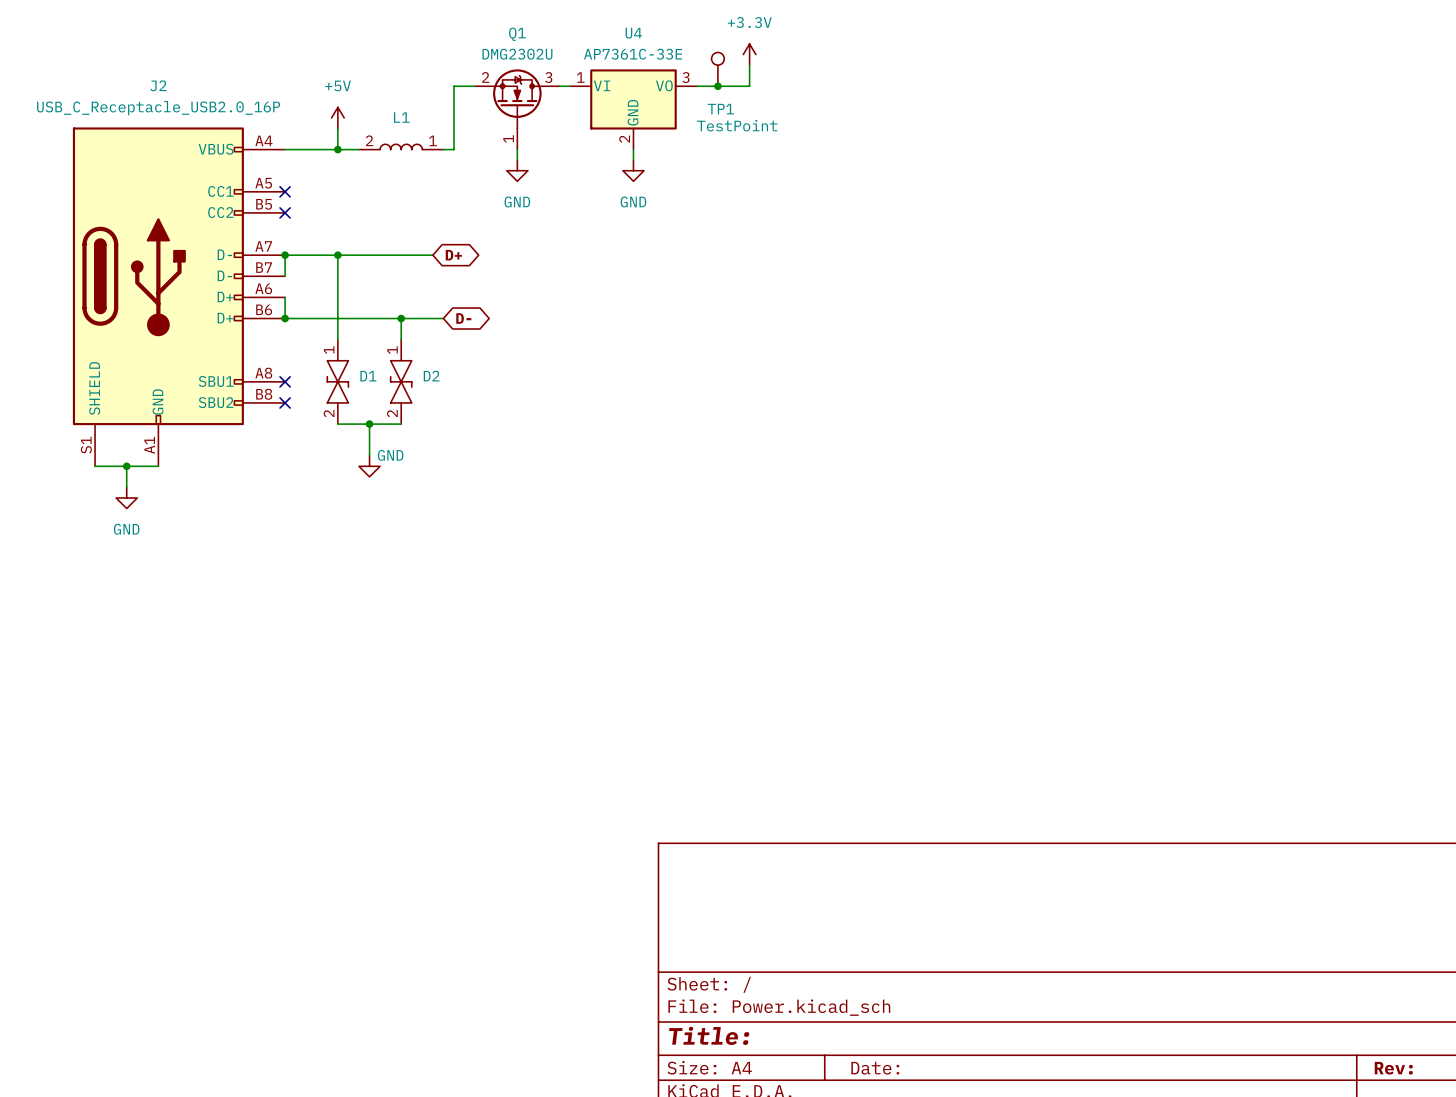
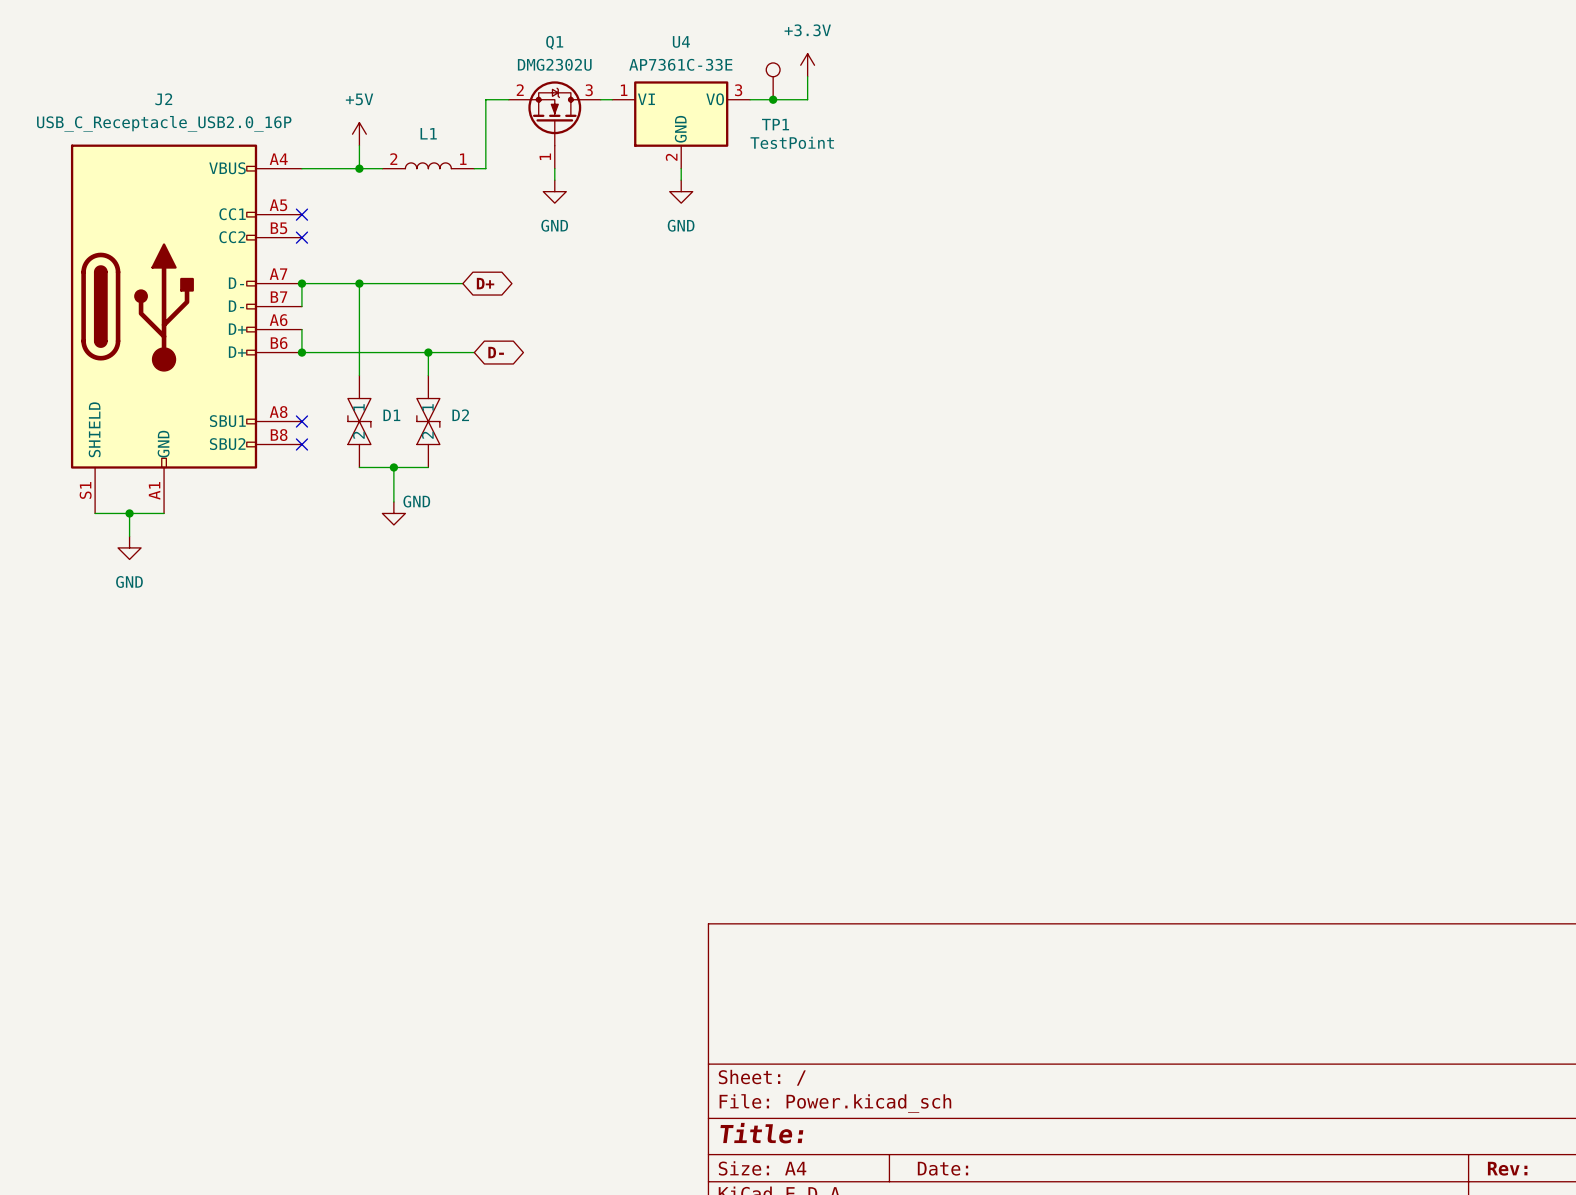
D1 pin number: 1 (329, 350) -> none
D2 pin number: 1 (392, 350) -> none
D1 pin name: none -> 1 (358, 407)
D2 pin name: none -> 1 (427, 407)
D1 pin name: none -> 2 (358, 435)
D2 pin name: none -> 2 (427, 435)
D1 pin number: 2 (329, 413) -> none
D2 pin number: 2 (392, 413) -> none

